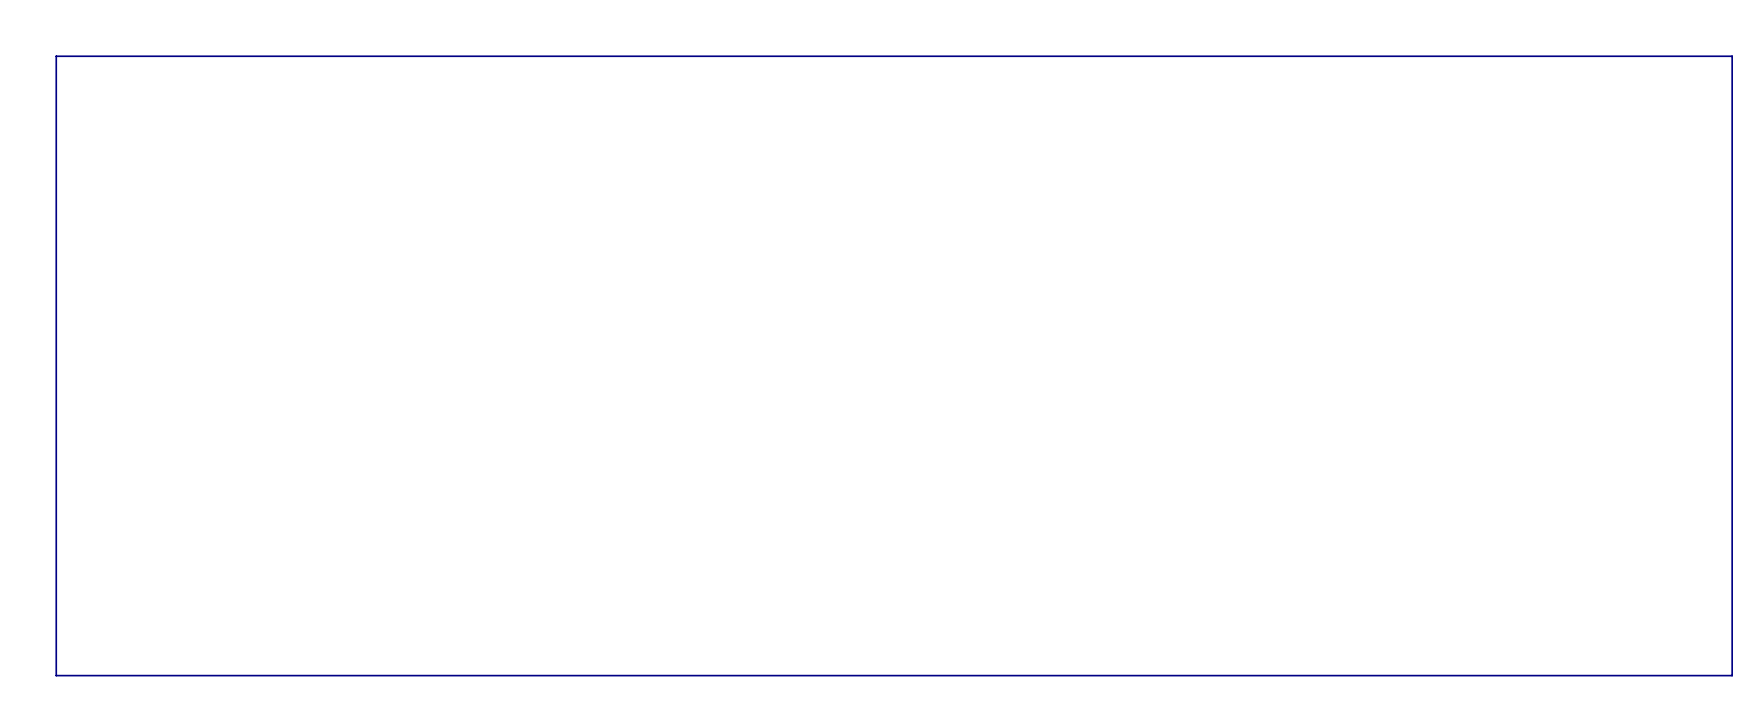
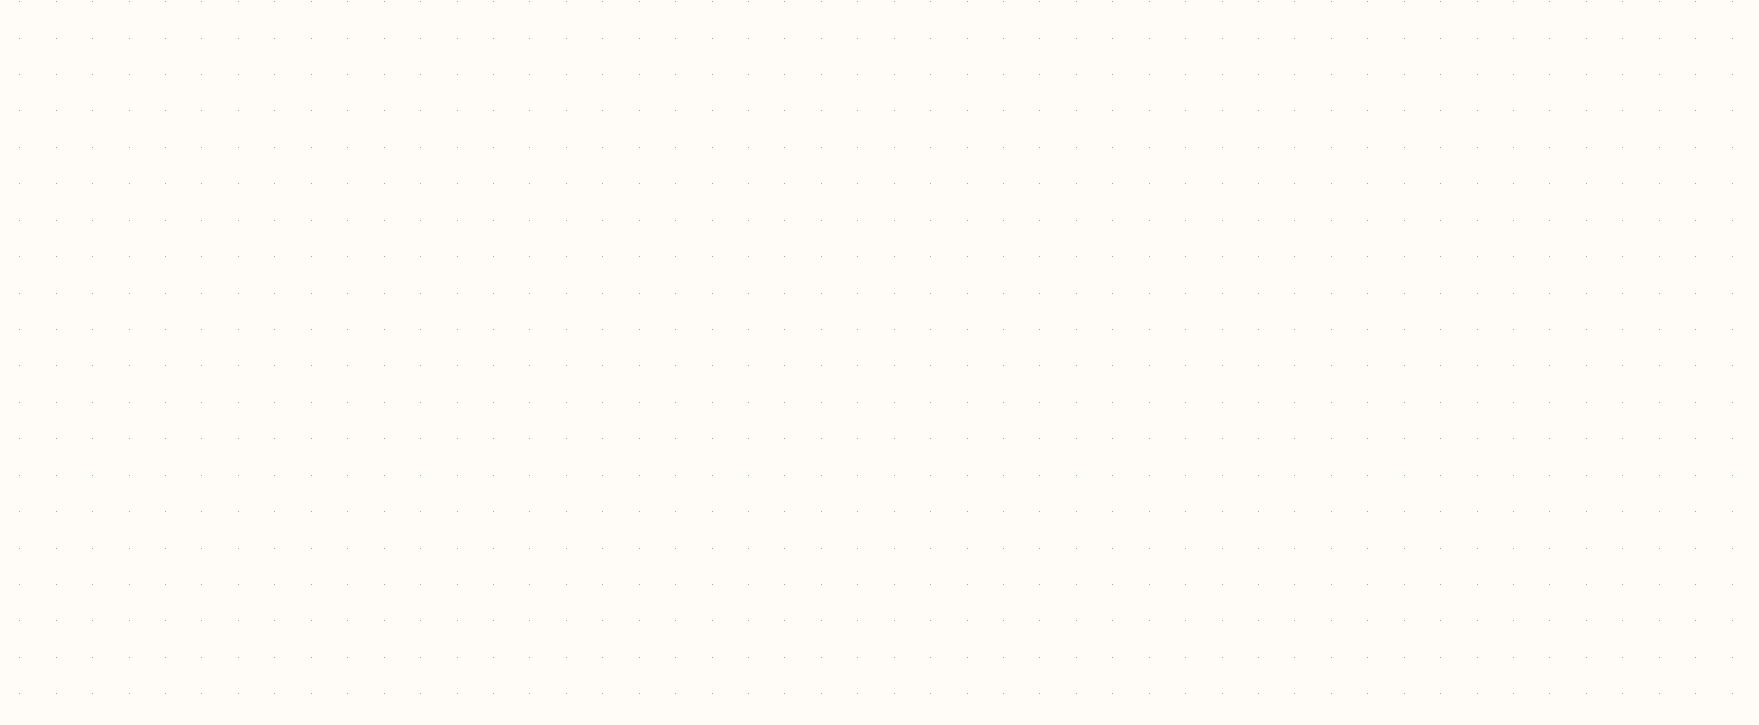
line: (56, 56) (1732, 56) (1732, 675) (56, 675) (56, 56) -> none

